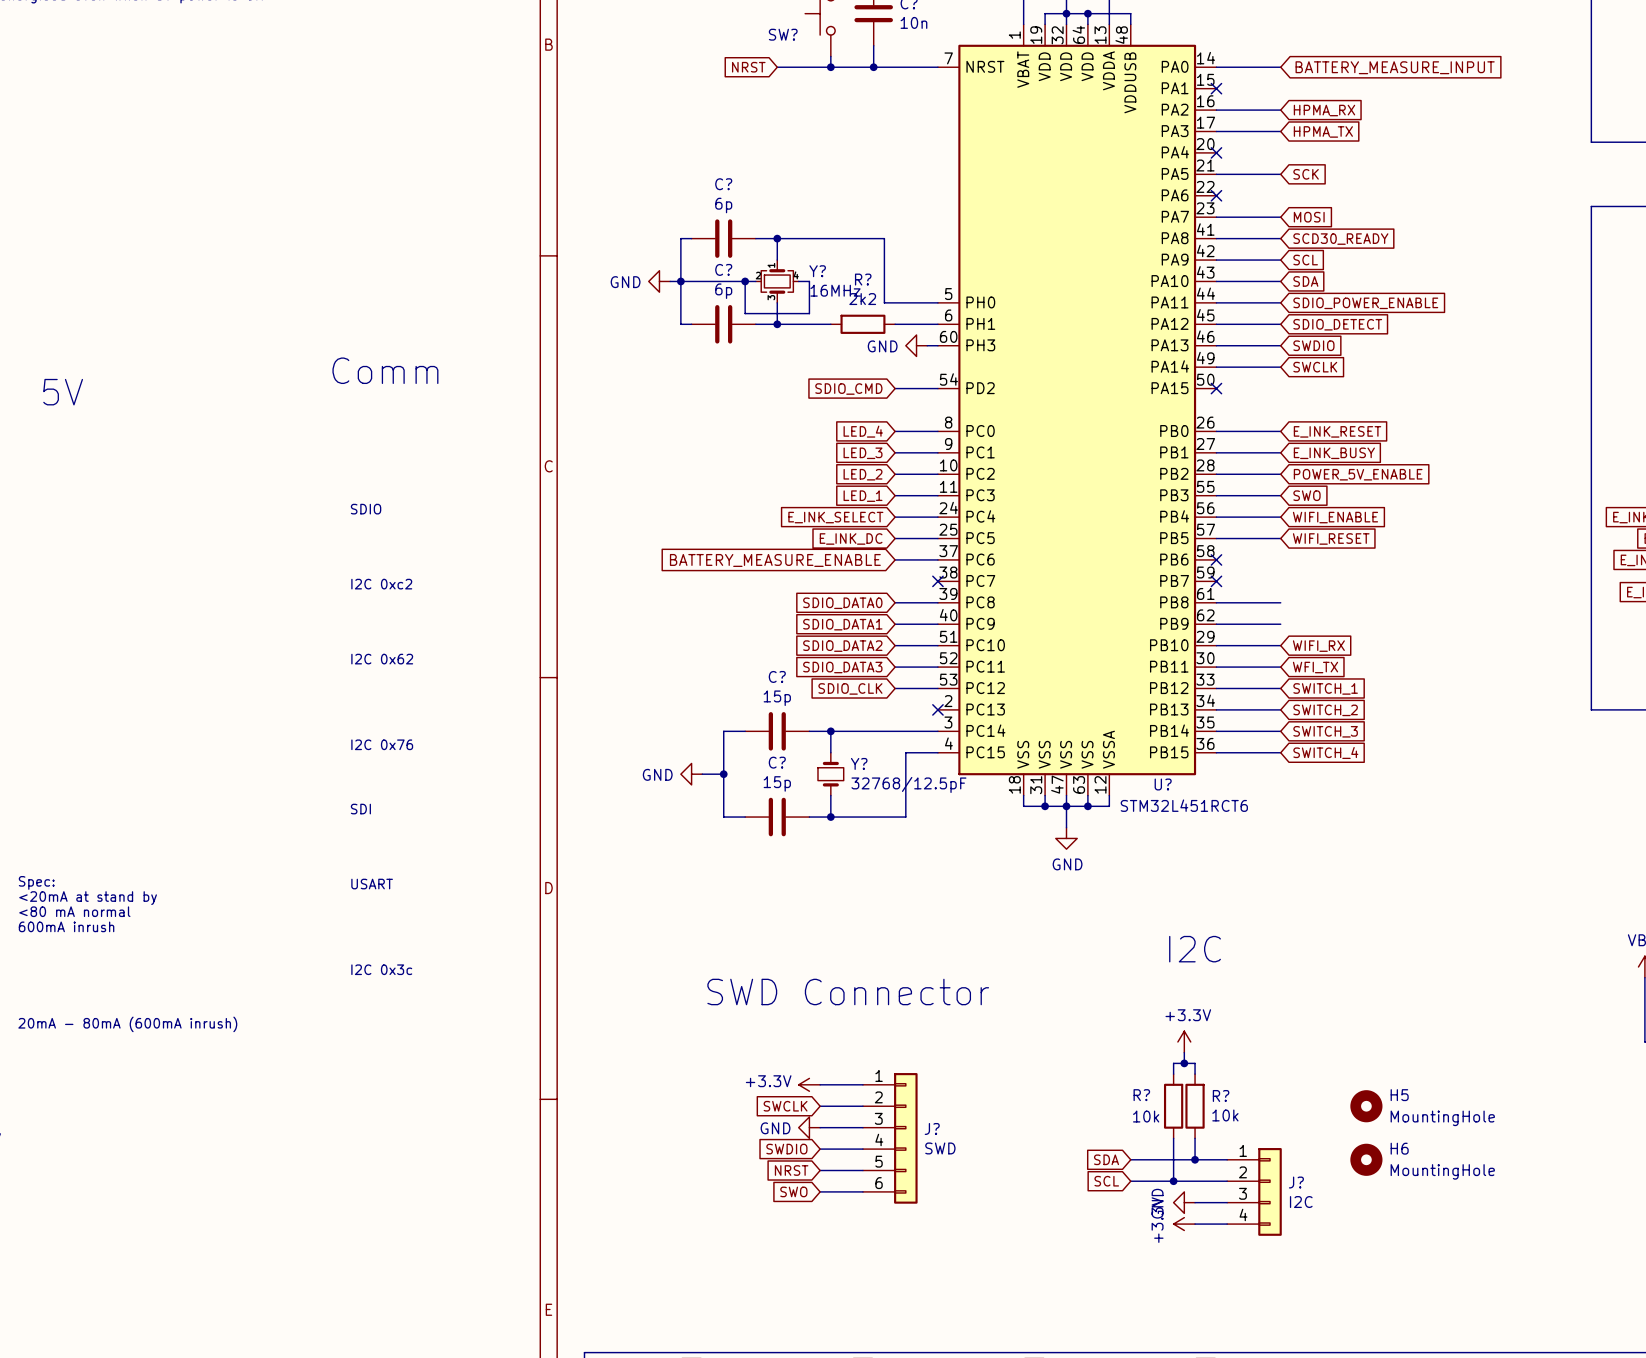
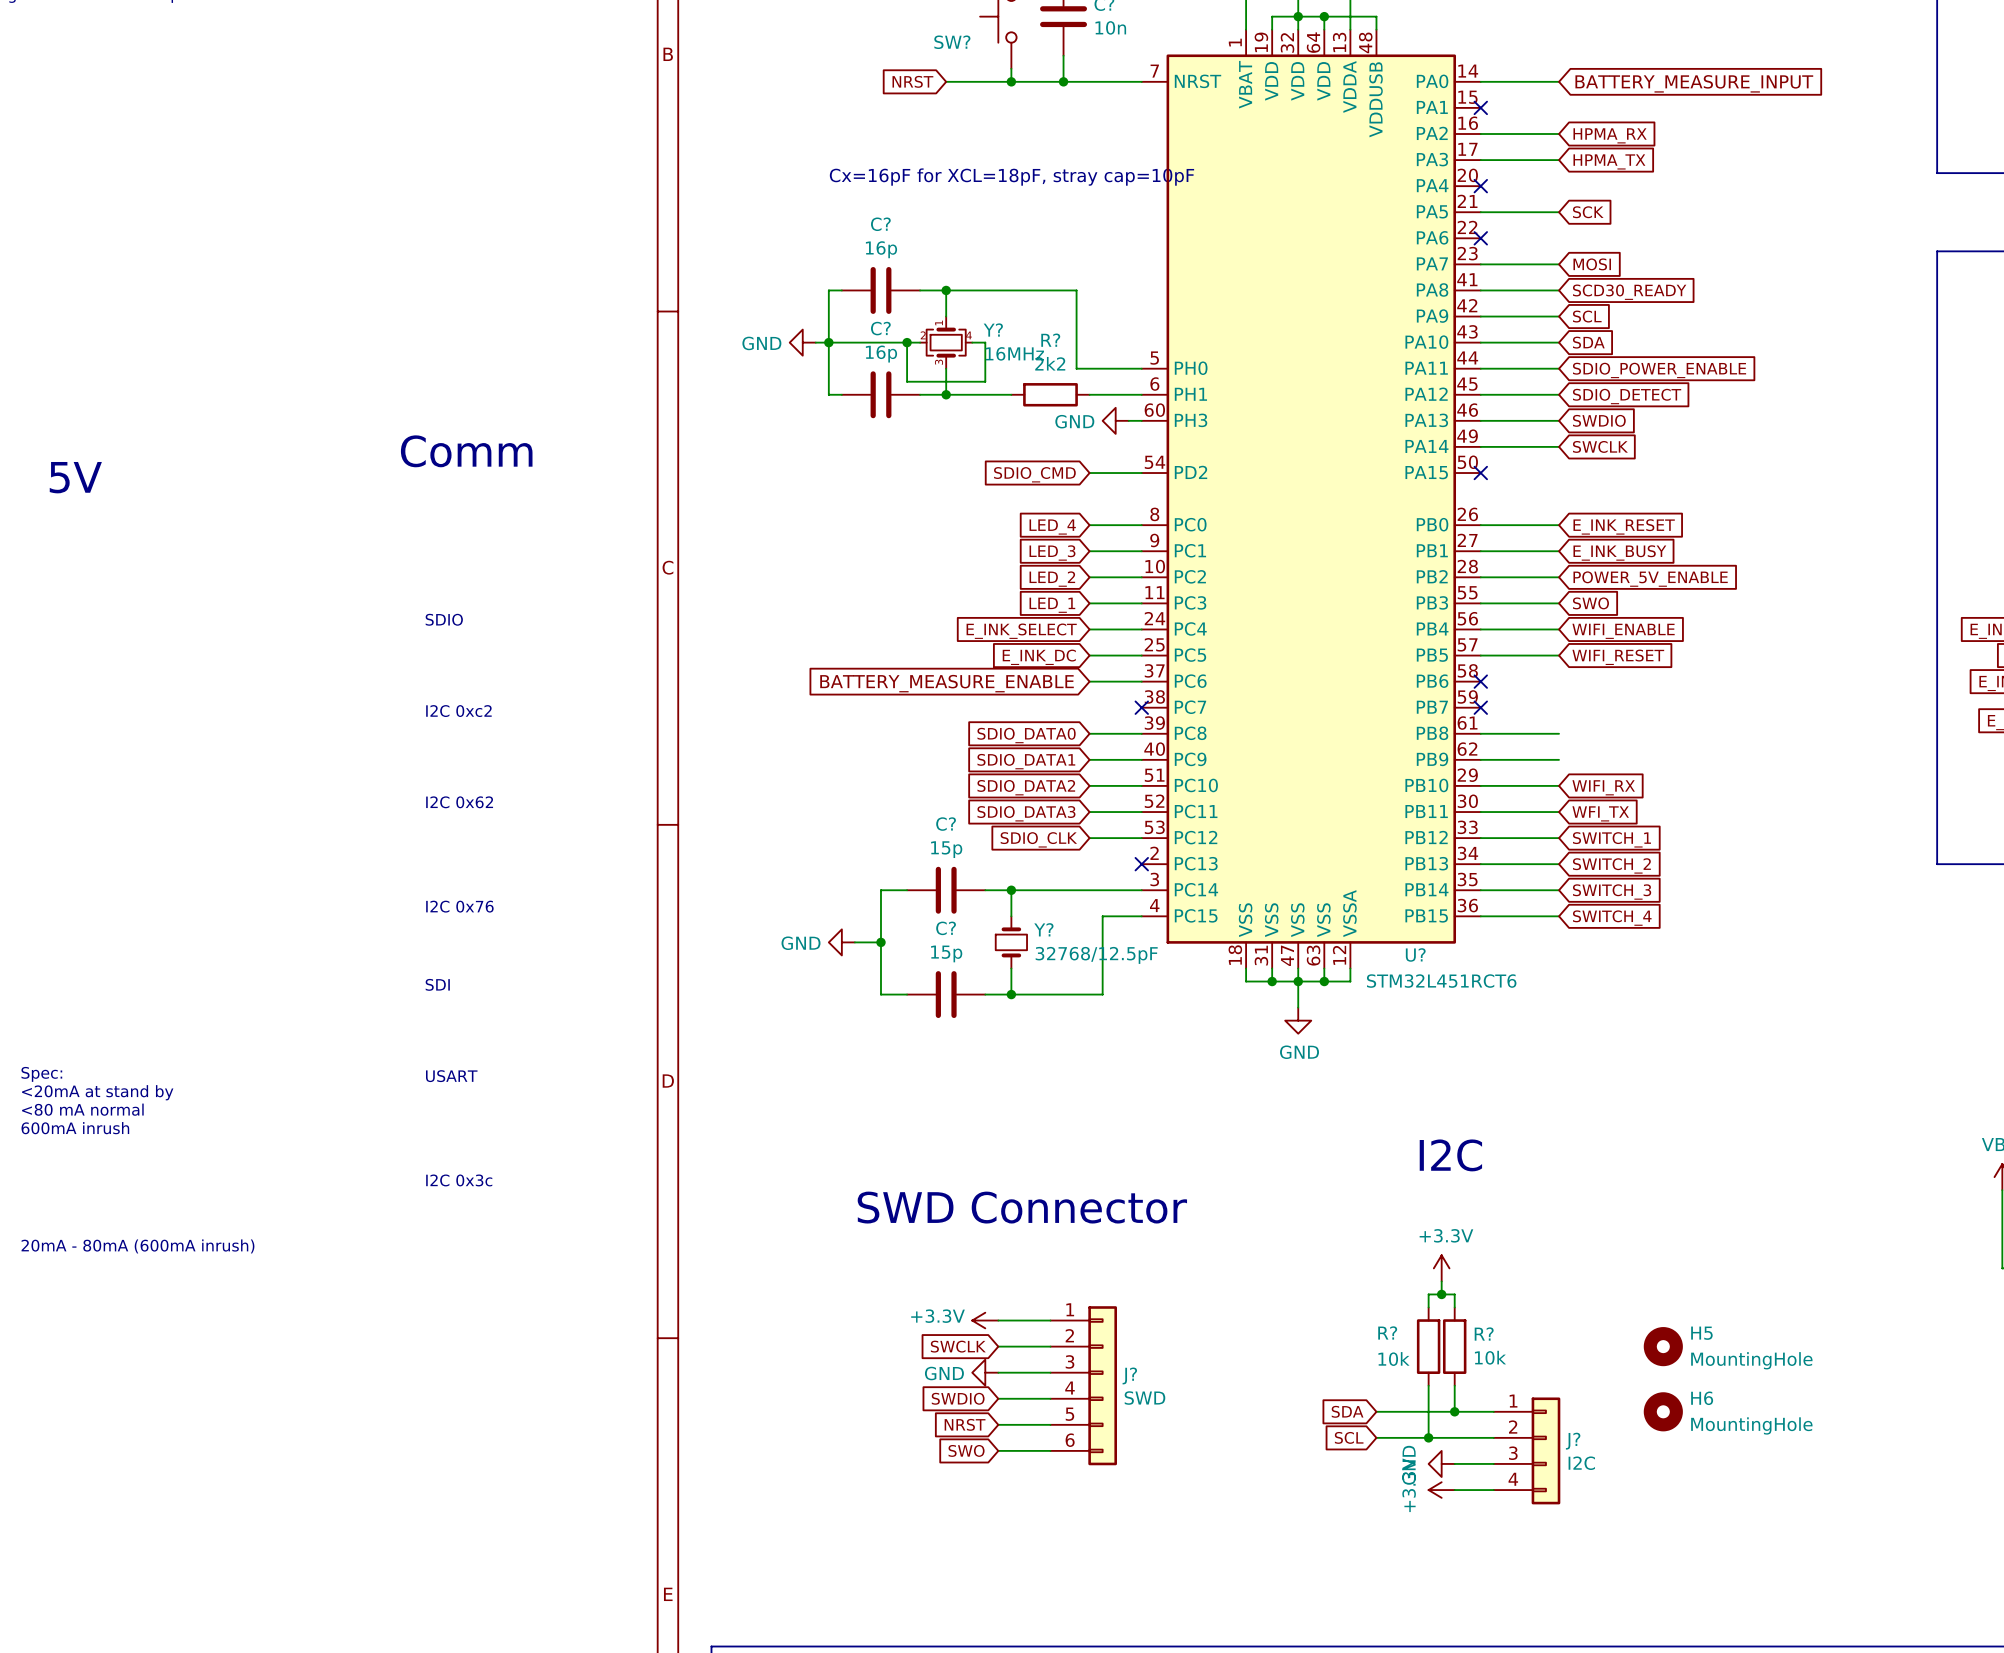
text: none -> Cx=16pF for XCL=18pF, stray cap=10pF (1011, 177)
C? value: 6p (723, 205) -> 16p (881, 249)
C? value: 6p (723, 291) -> 16p (881, 354)

